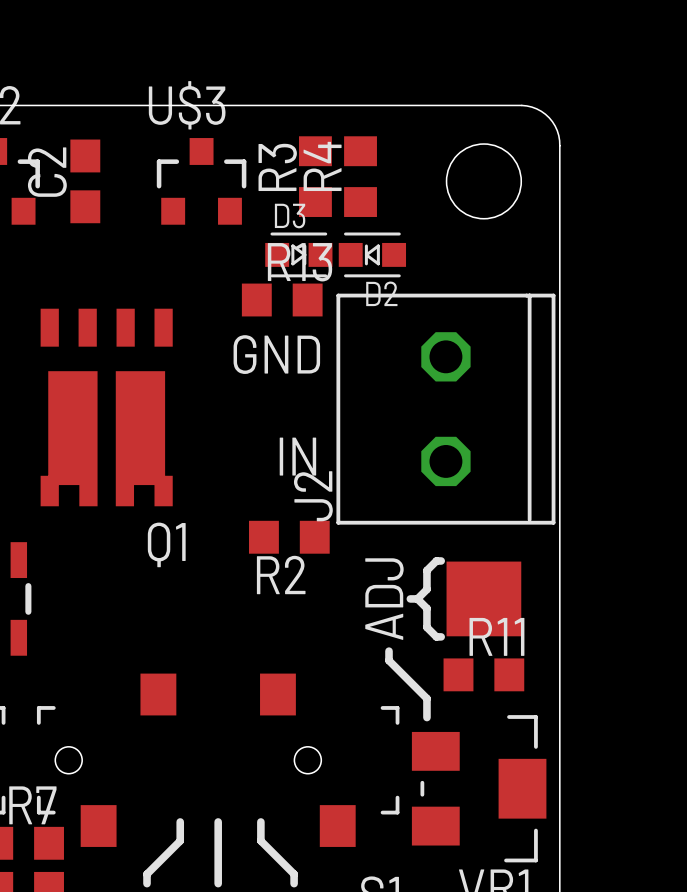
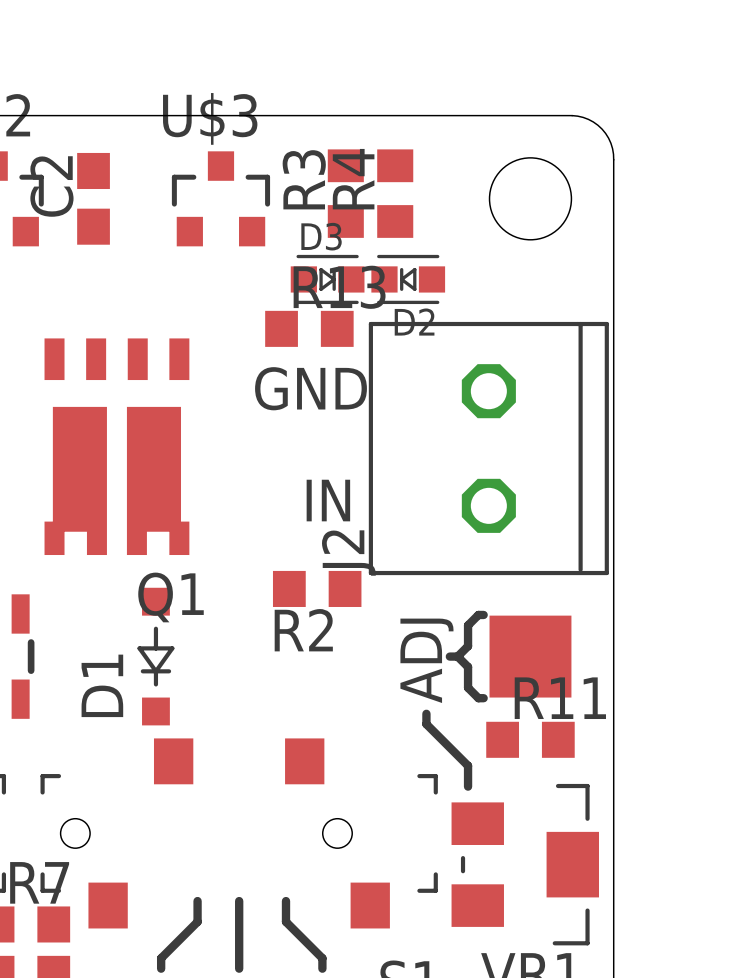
D1: none -> (155, 656)

